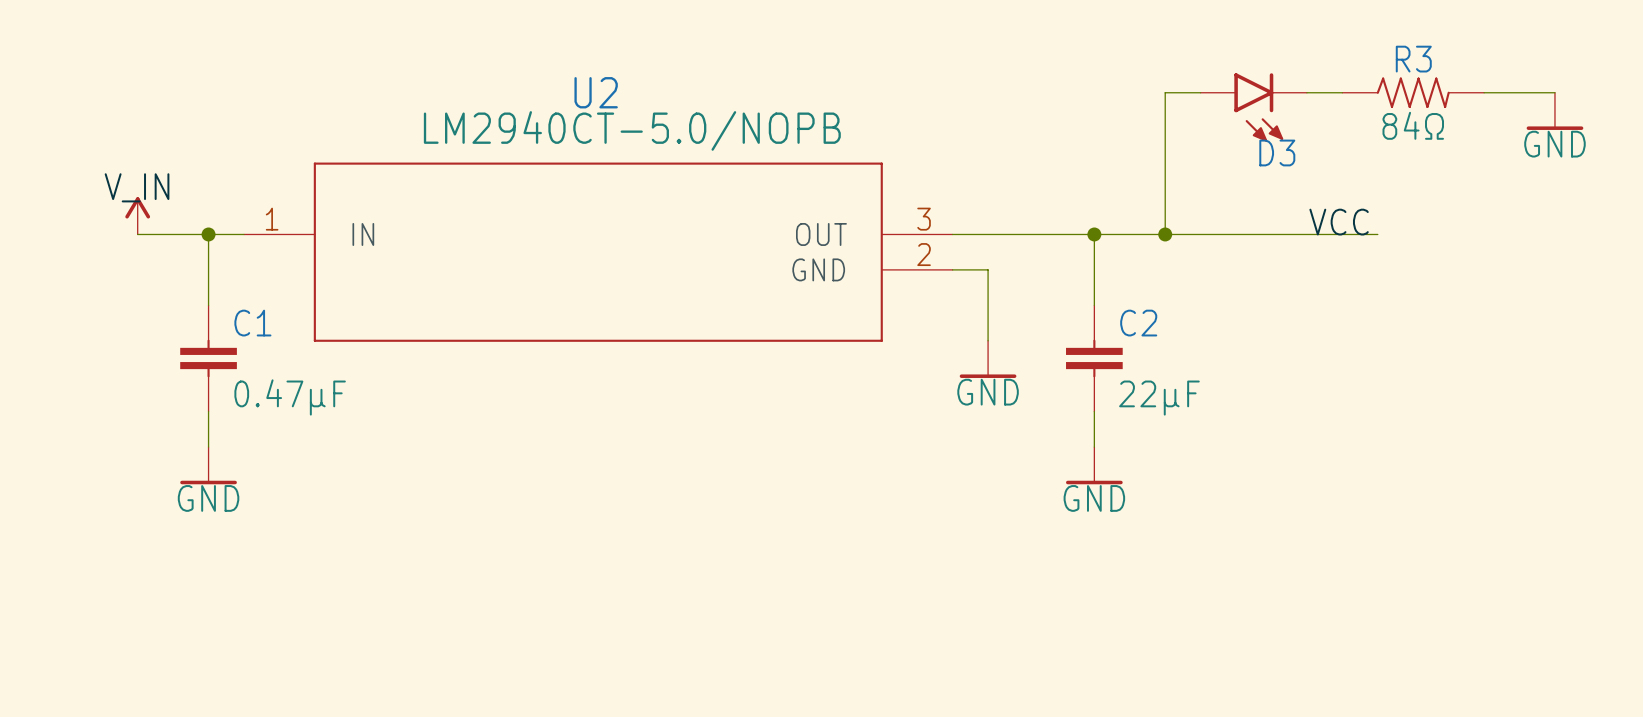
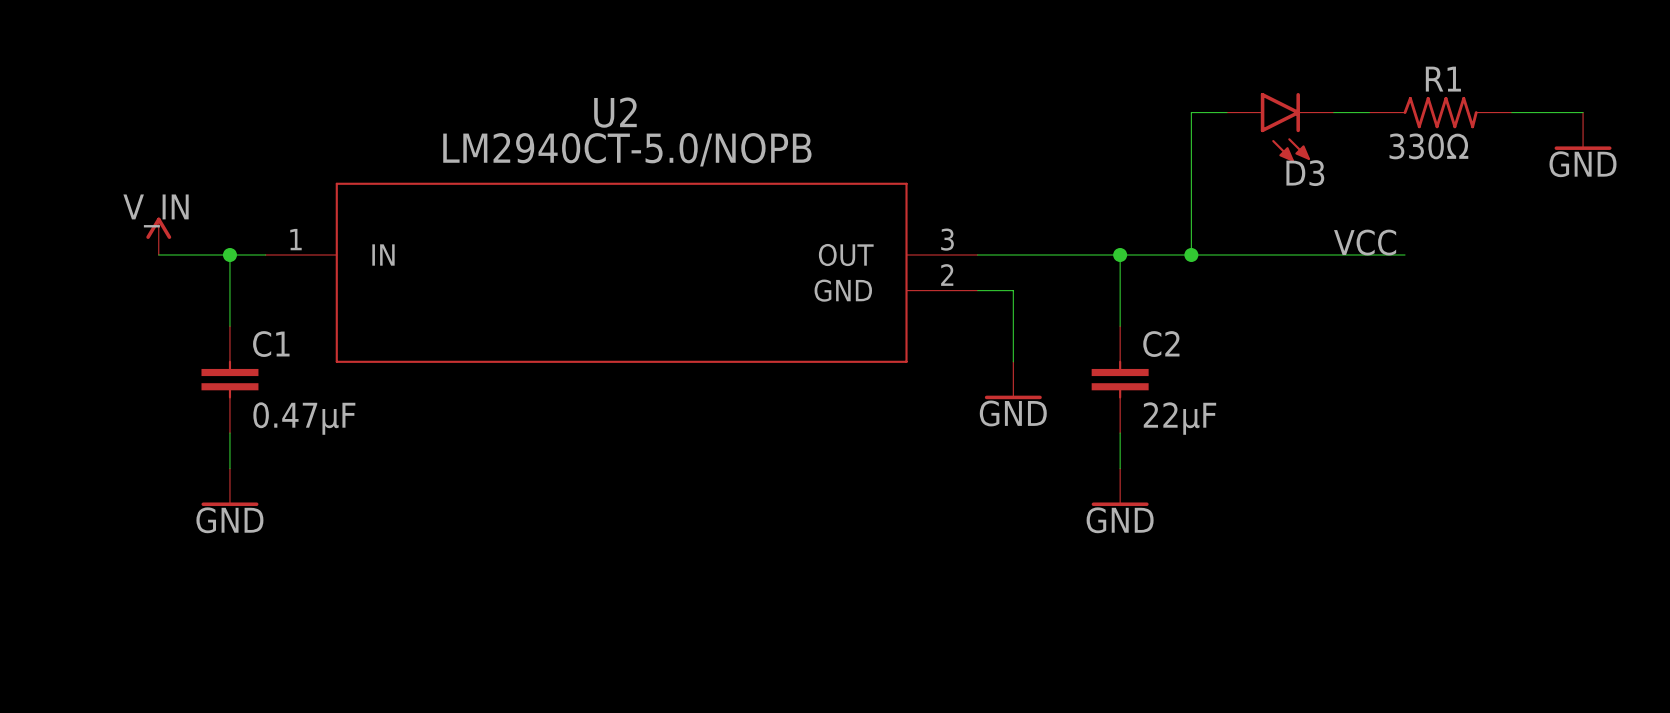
R3: 84Ω (1413, 92) -> none
R1: none -> 330Ω (1440, 112)

